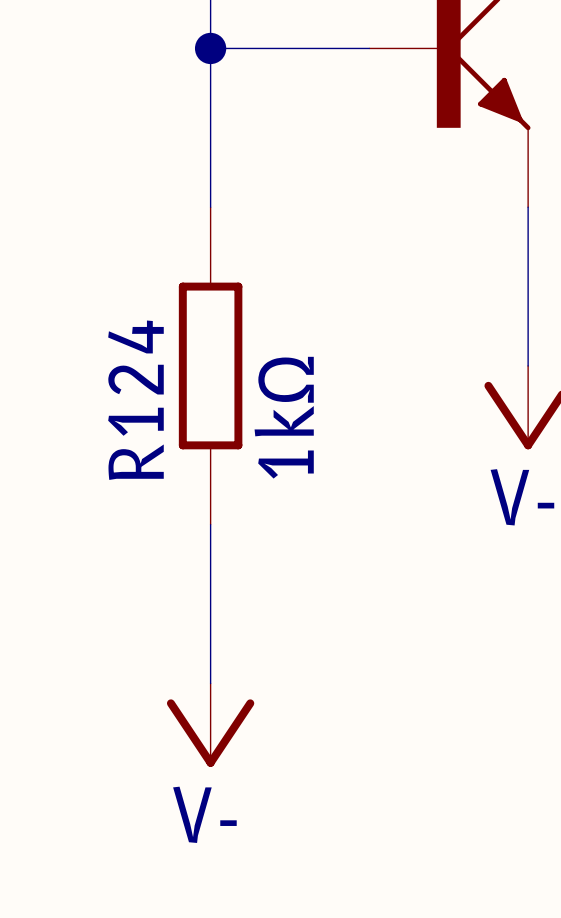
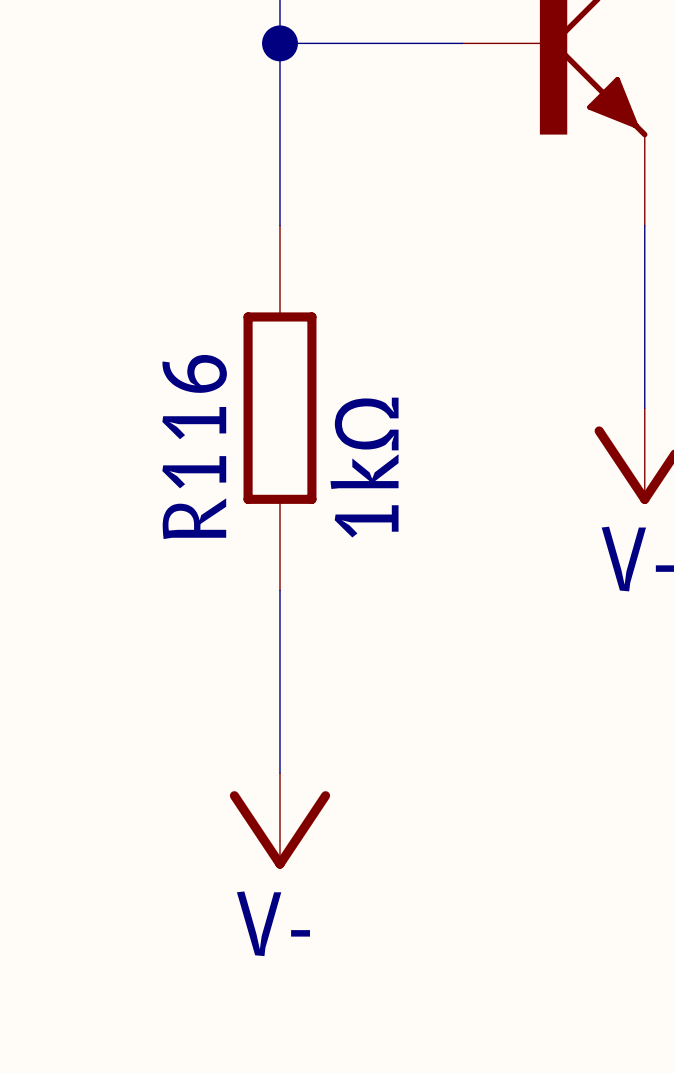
R124 name: R124 (135, 400) -> R116 (194, 447)

